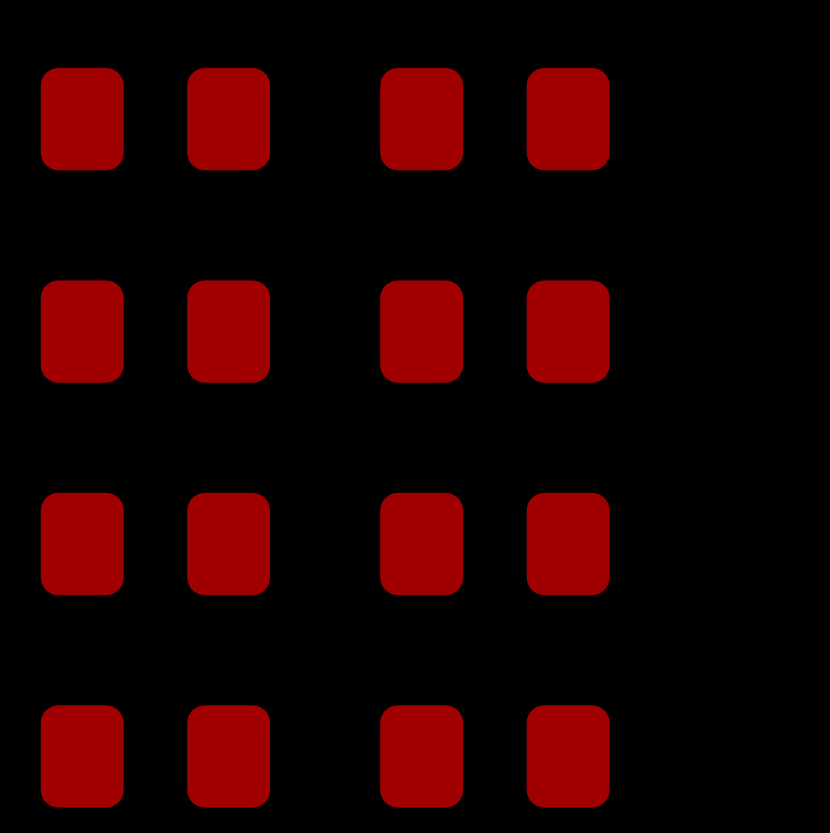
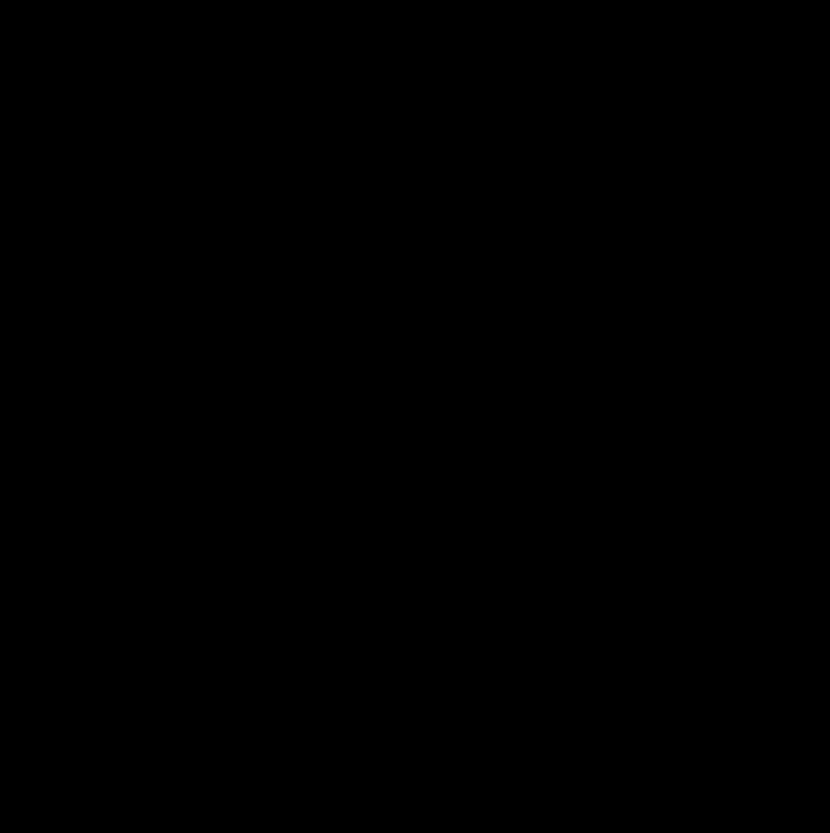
part: (155, 119) -> none
part: (494, 119) -> none
part: (155, 331) -> none
part: (494, 331) -> none
part: (155, 544) -> none
part: (494, 544) -> none
part: (155, 756) -> none
part: (494, 756) -> none

